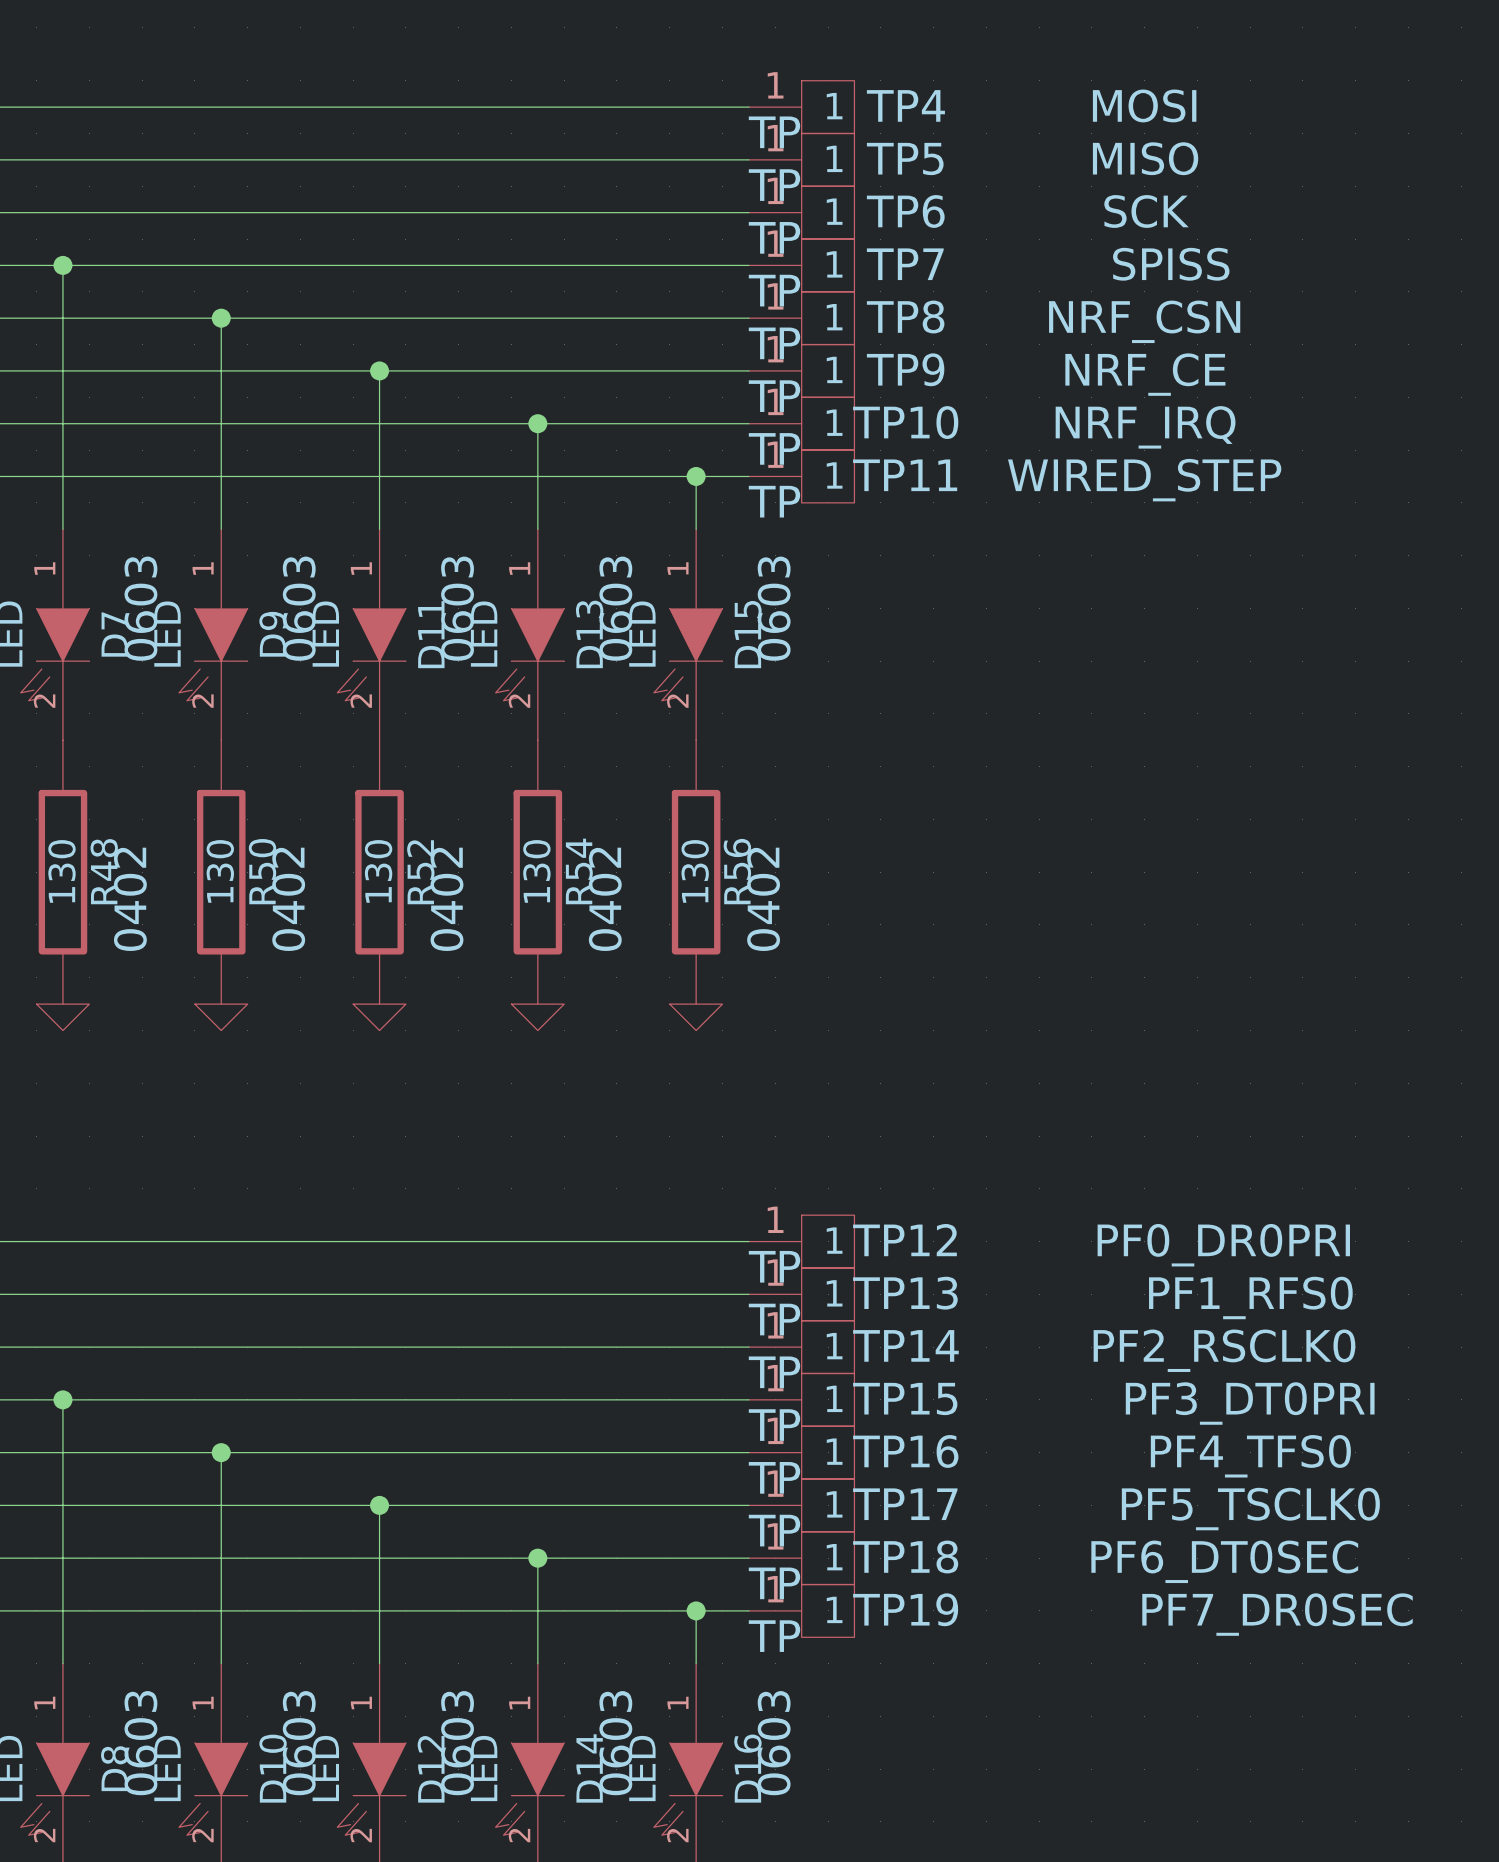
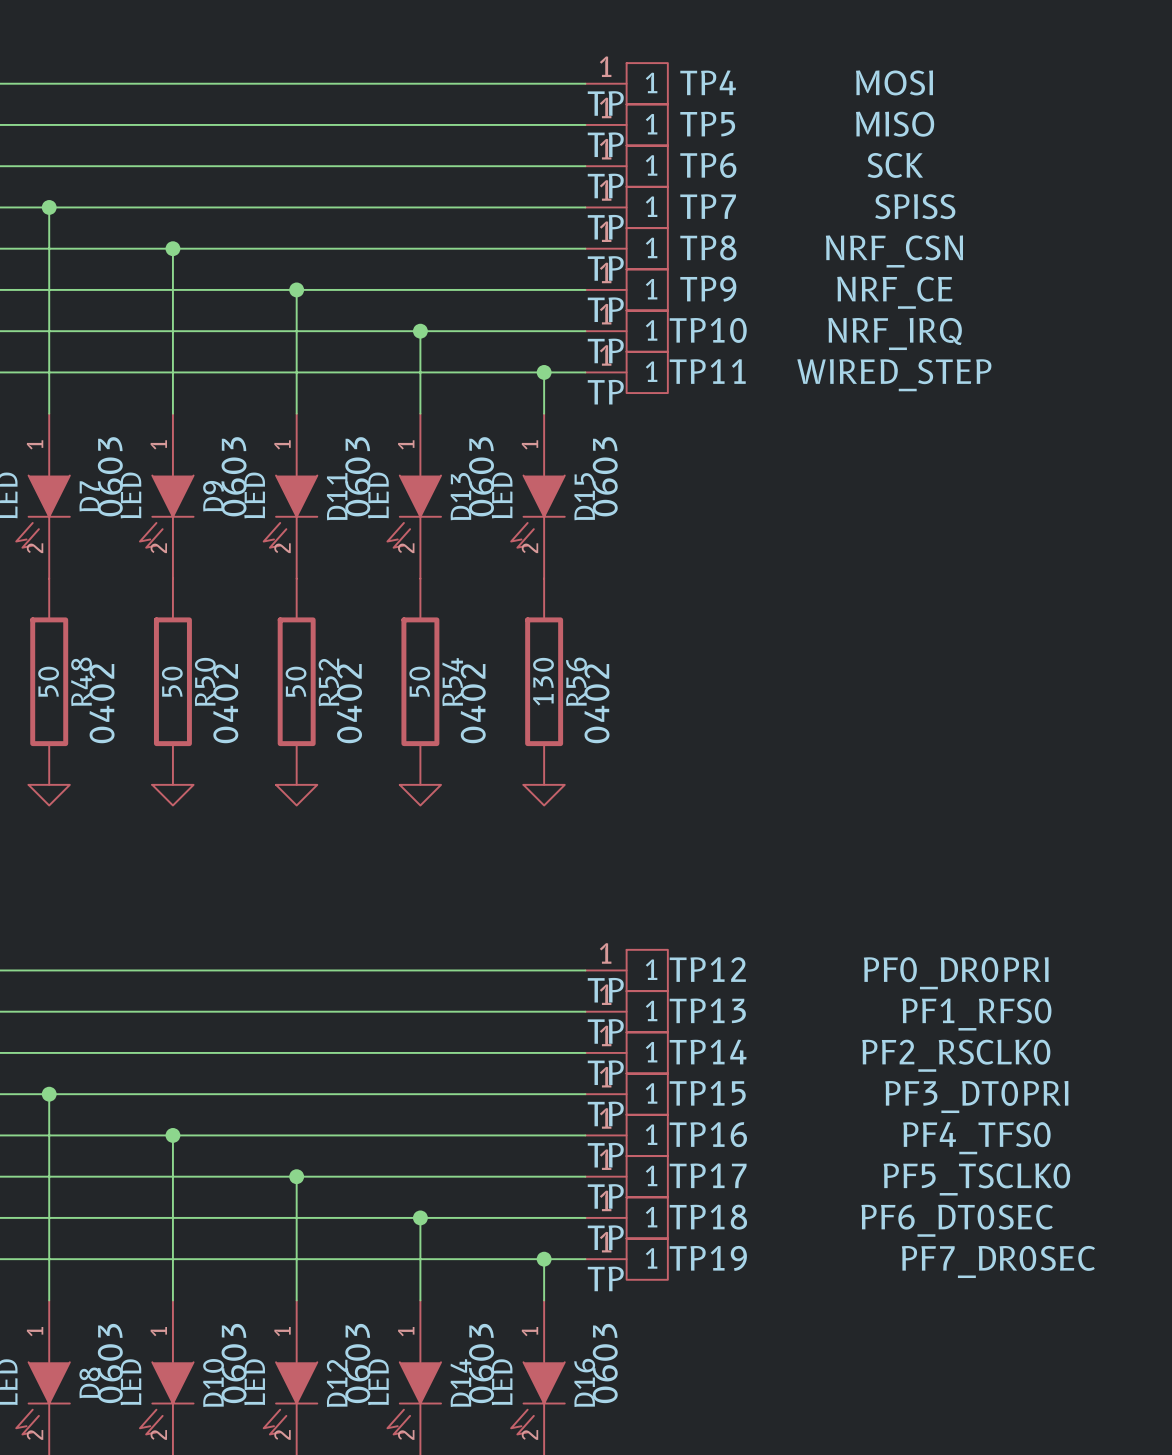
R48 value: 130 (61, 871) -> 50 (48, 681)
R50 value: 130 (220, 871) -> 50 (172, 681)
R52 value: 130 (378, 871) -> 50 (296, 681)
R54 value: 130 (536, 871) -> 50 (419, 681)

